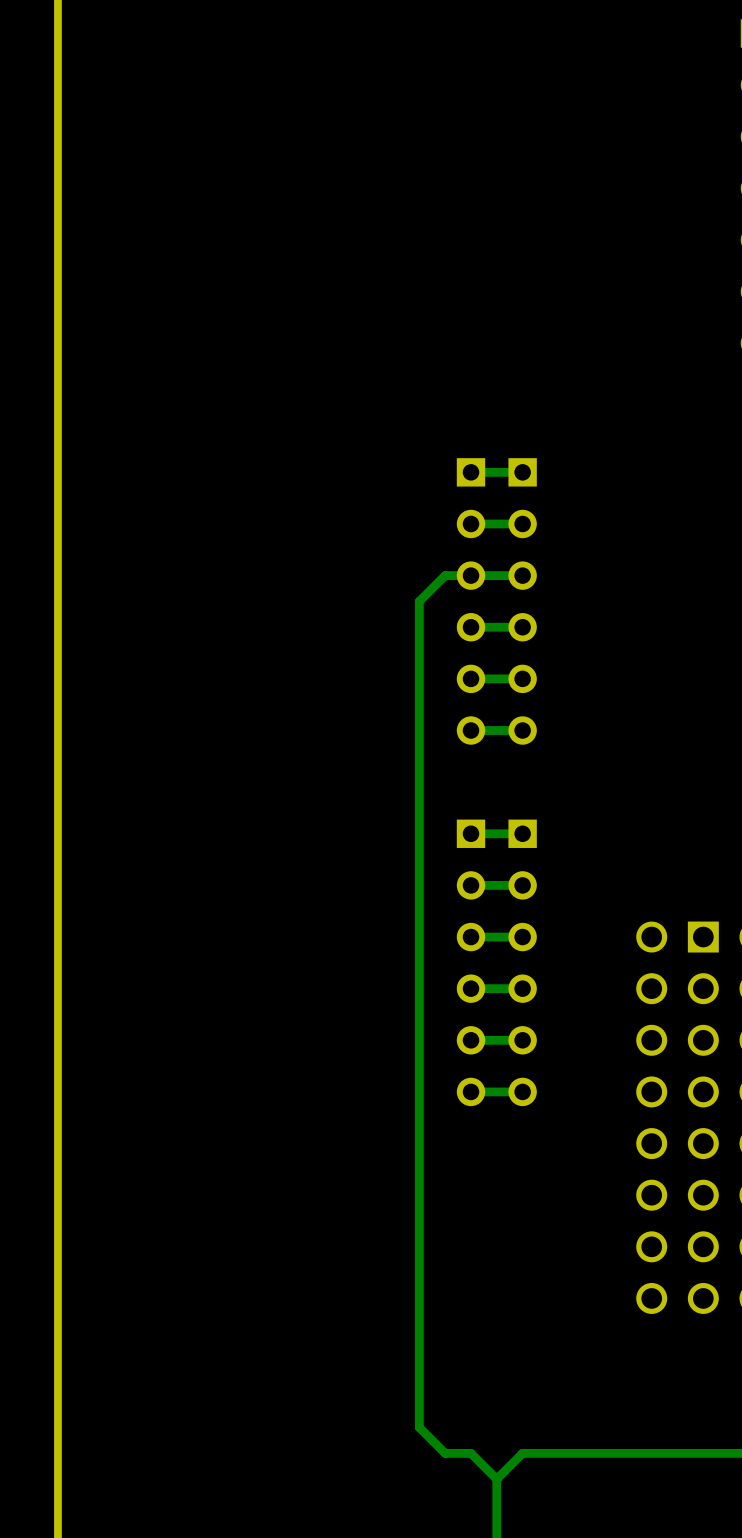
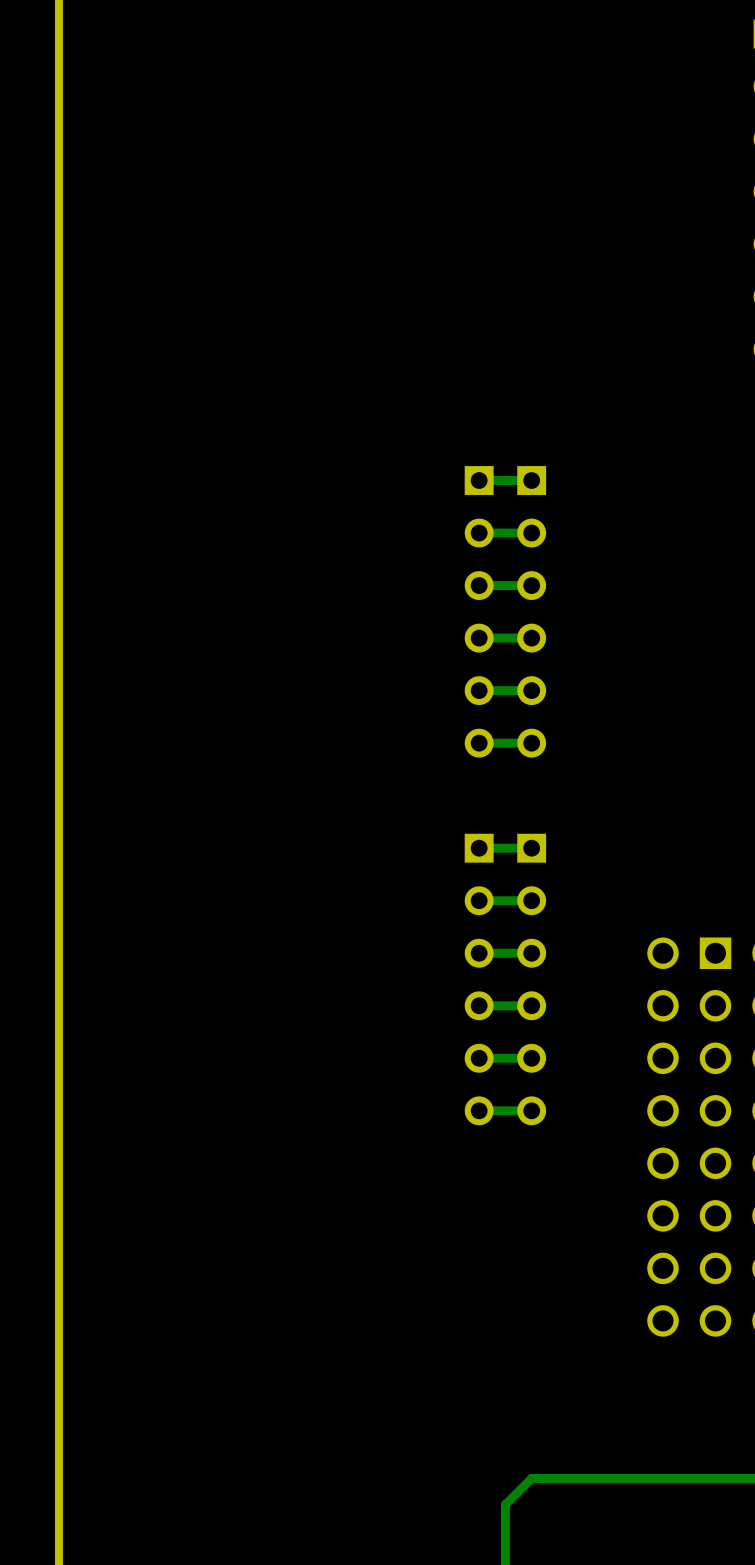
track: (471, 575) (445, 575) (419, 601) (419, 1427) (445, 1453) (471, 1453) (496, 1479) -> none

